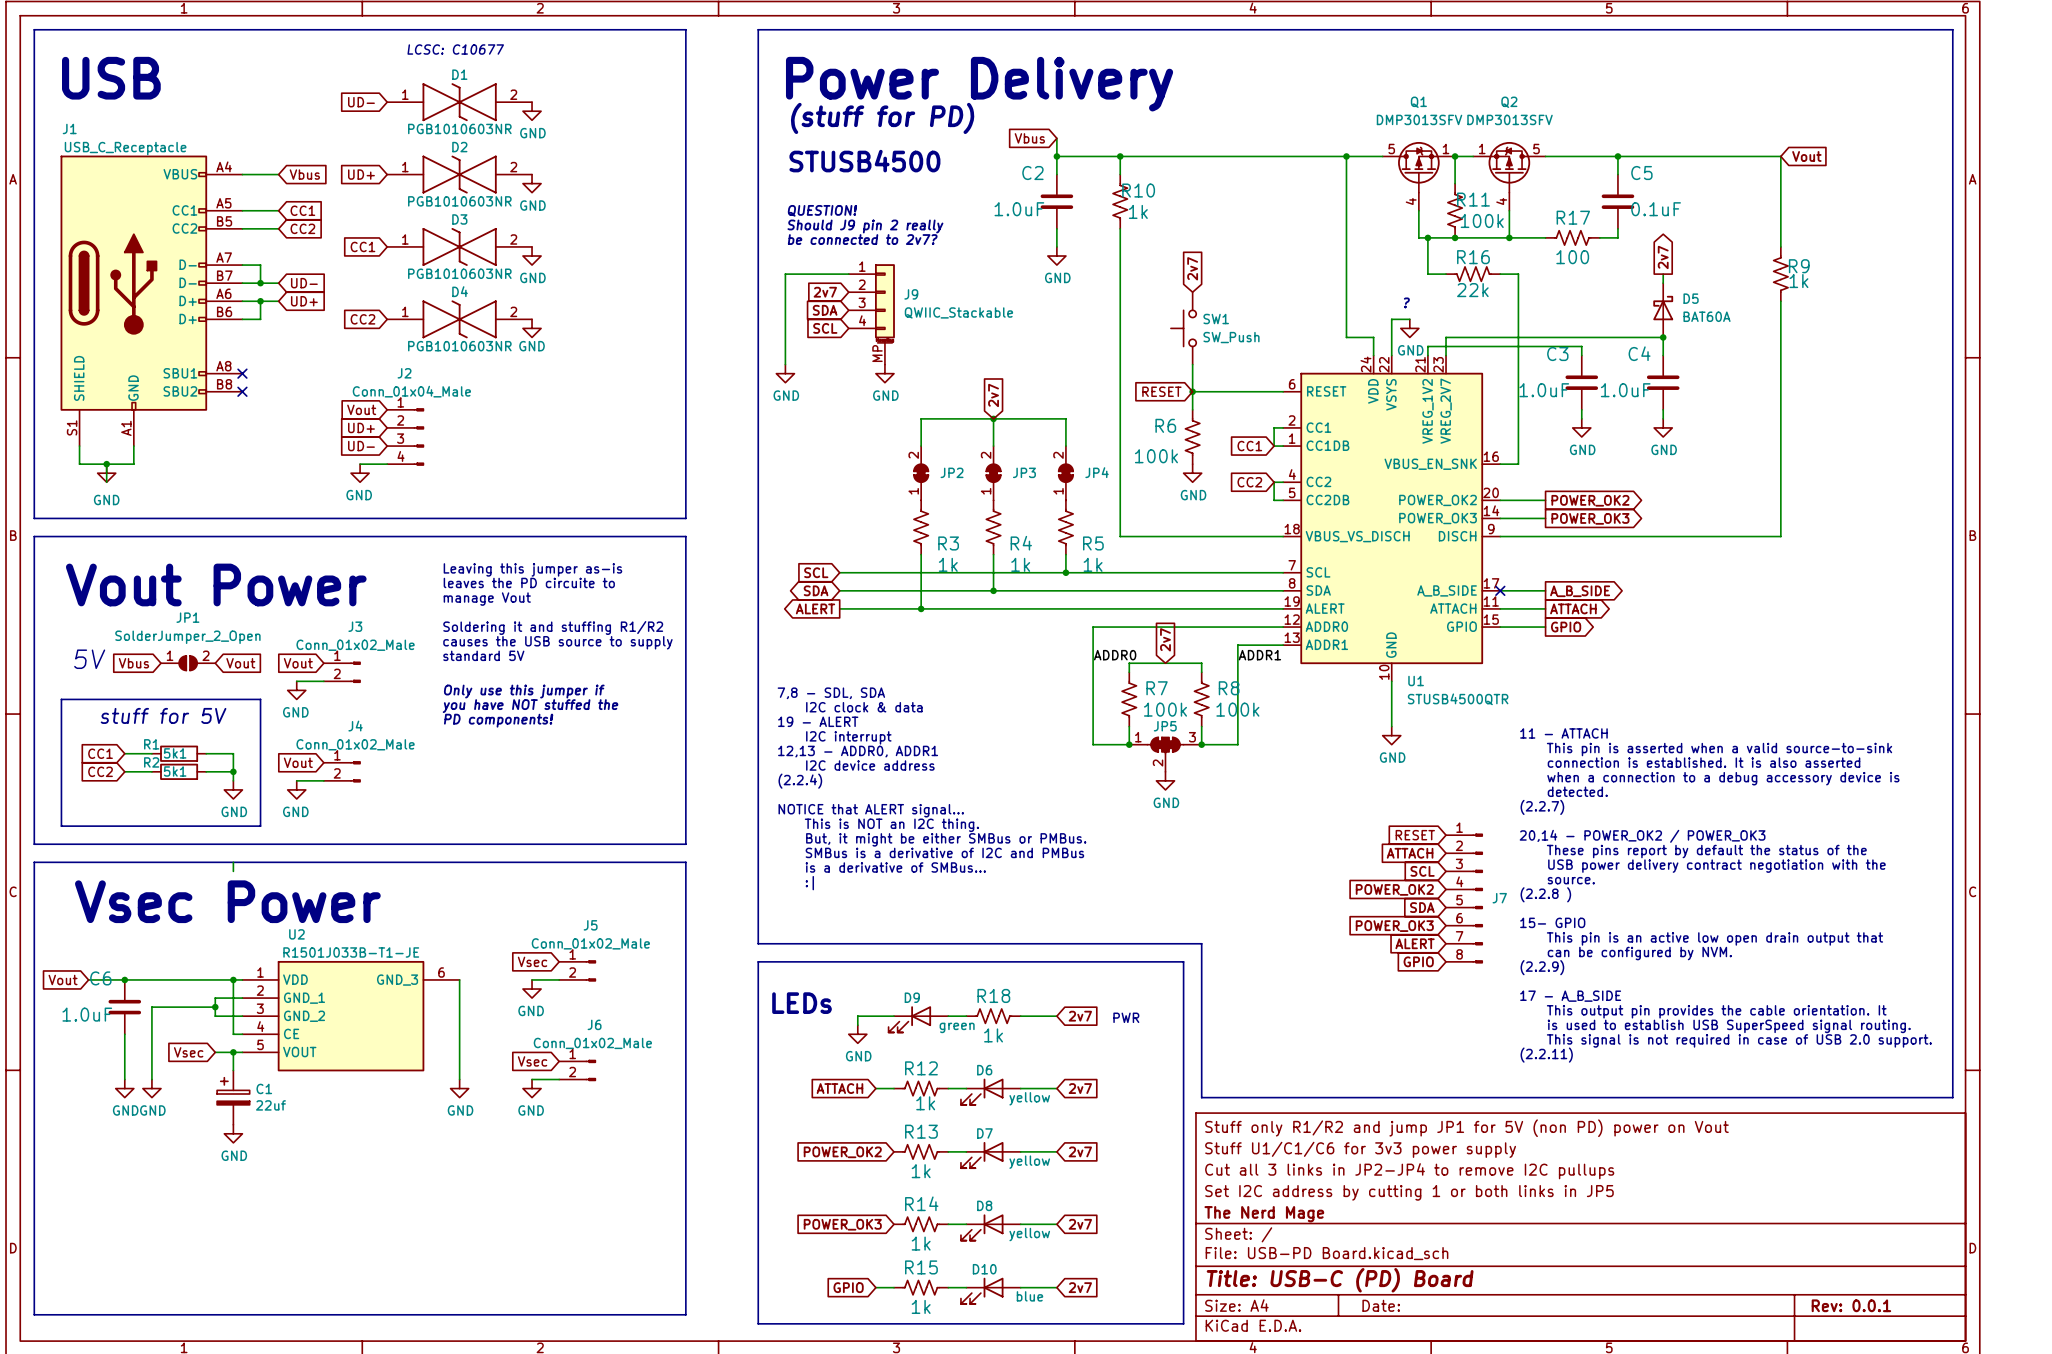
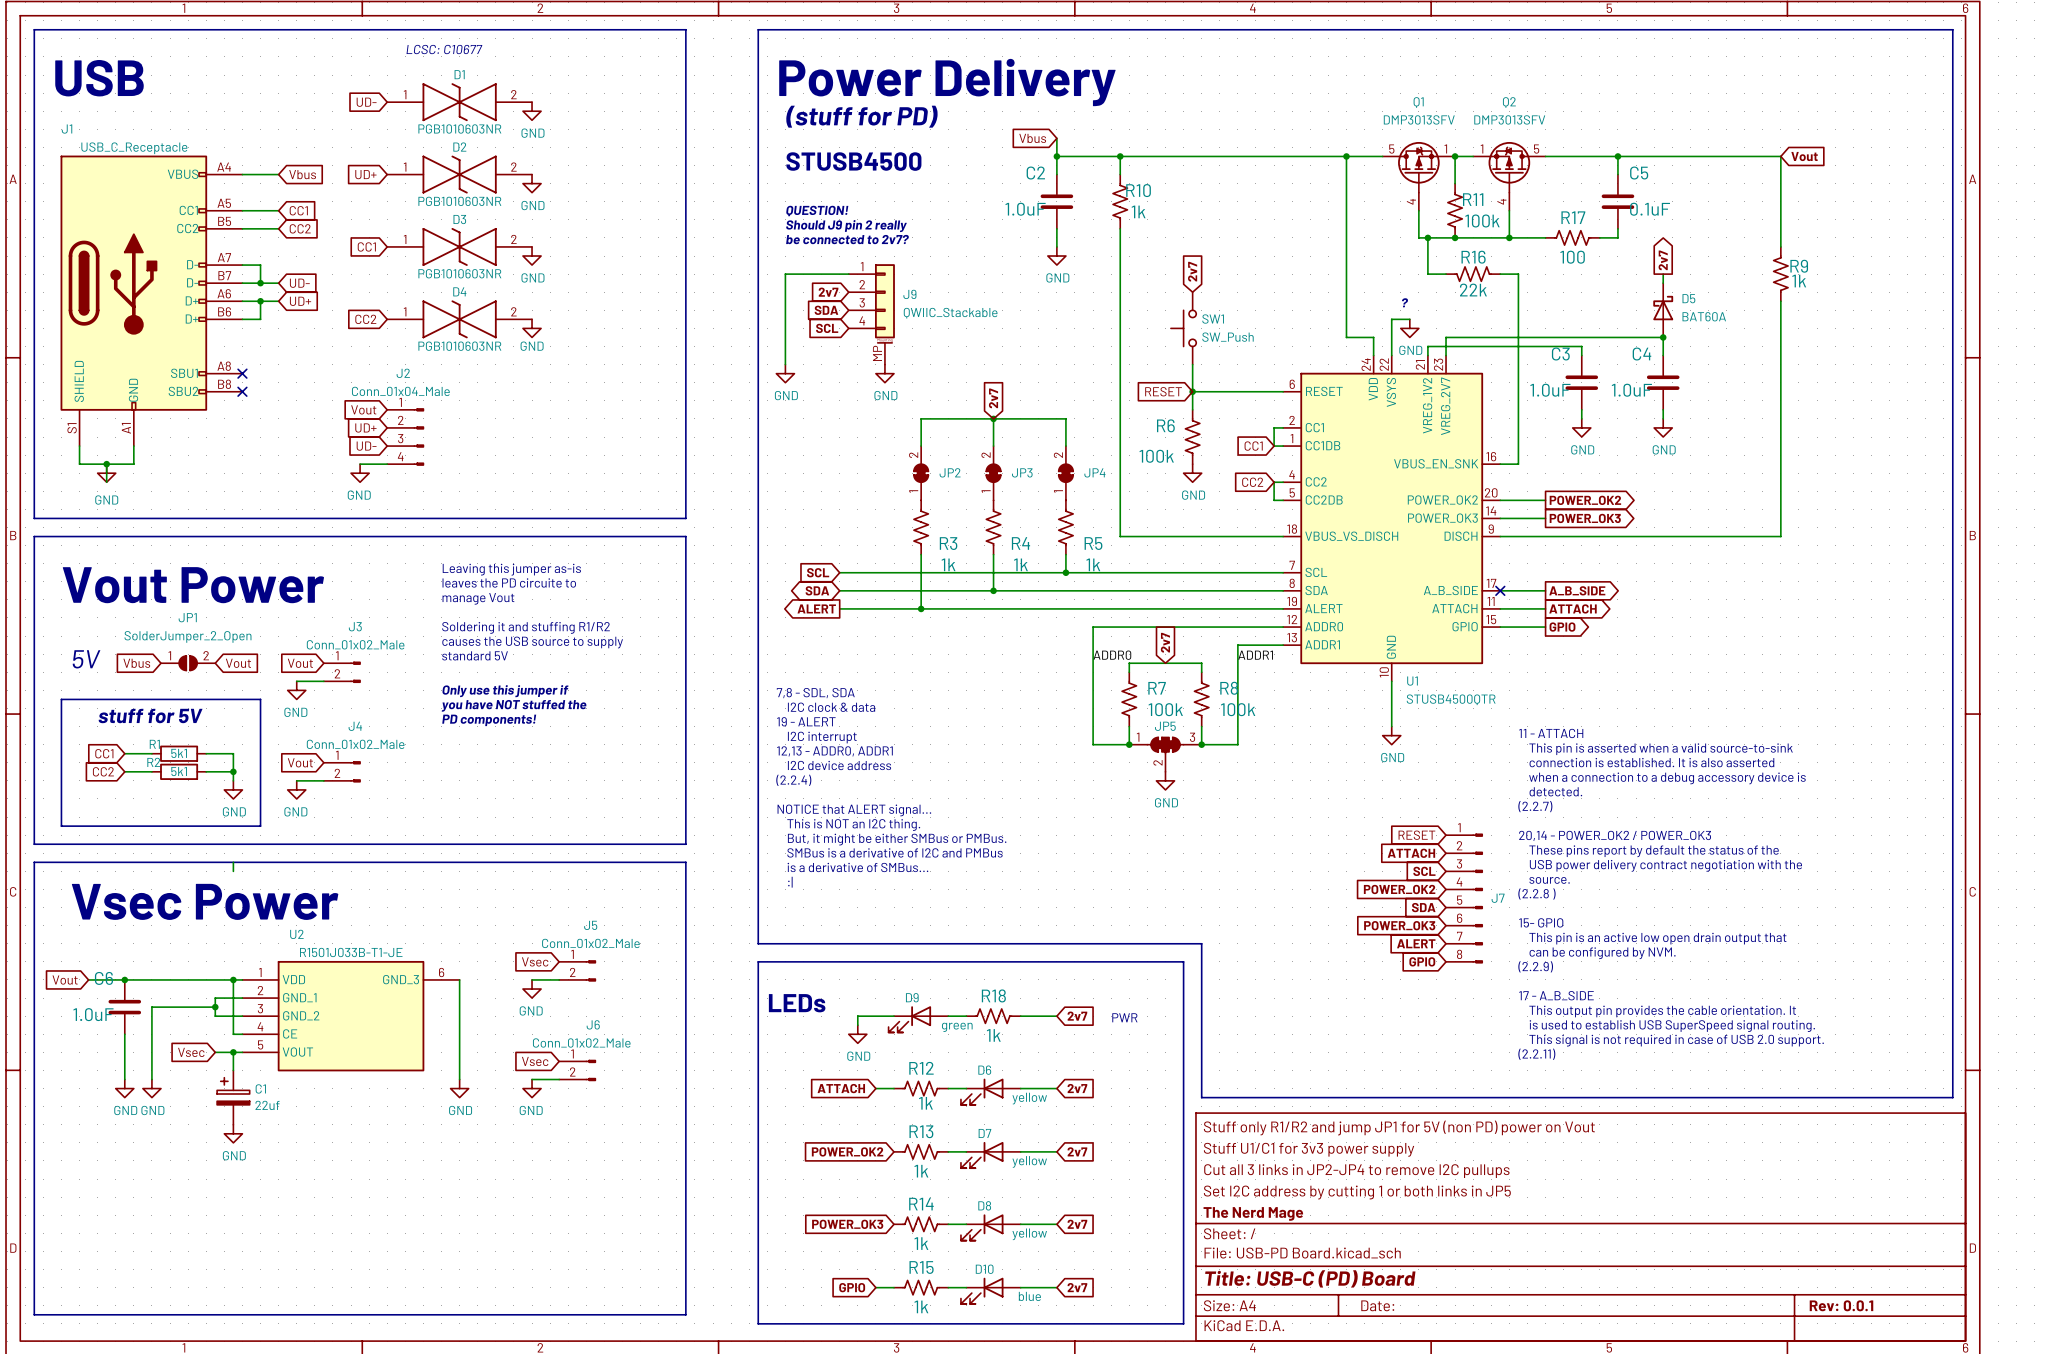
title block: Stuff U1/C1/C6 for 3v3 power supply (1360, 1149) -> Stuff U1/C1 for 3v3 power supply (1309, 1149)

